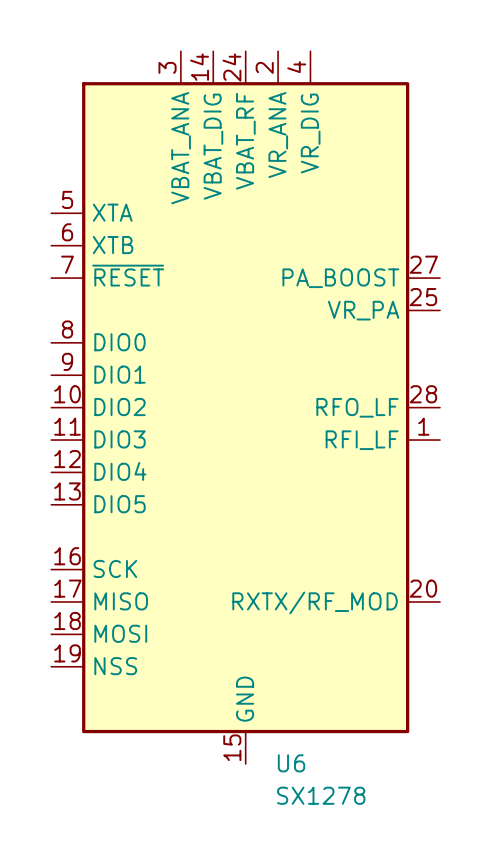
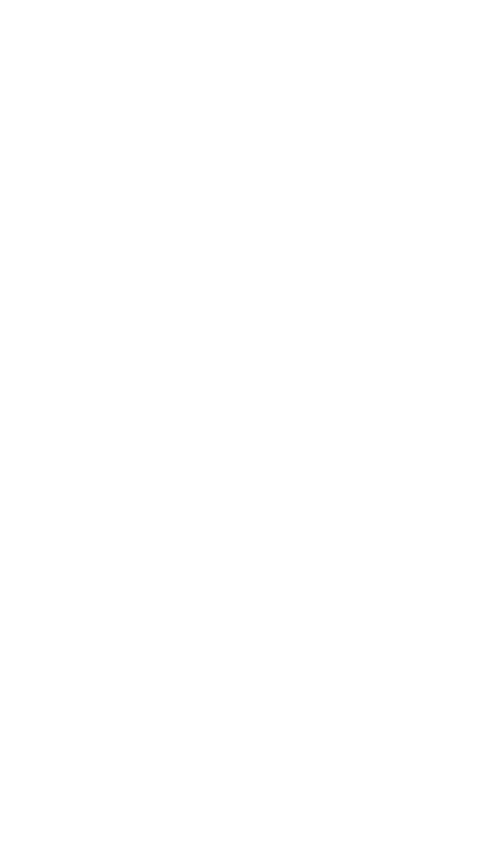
U6: SX1278 (245, 407) -> none

